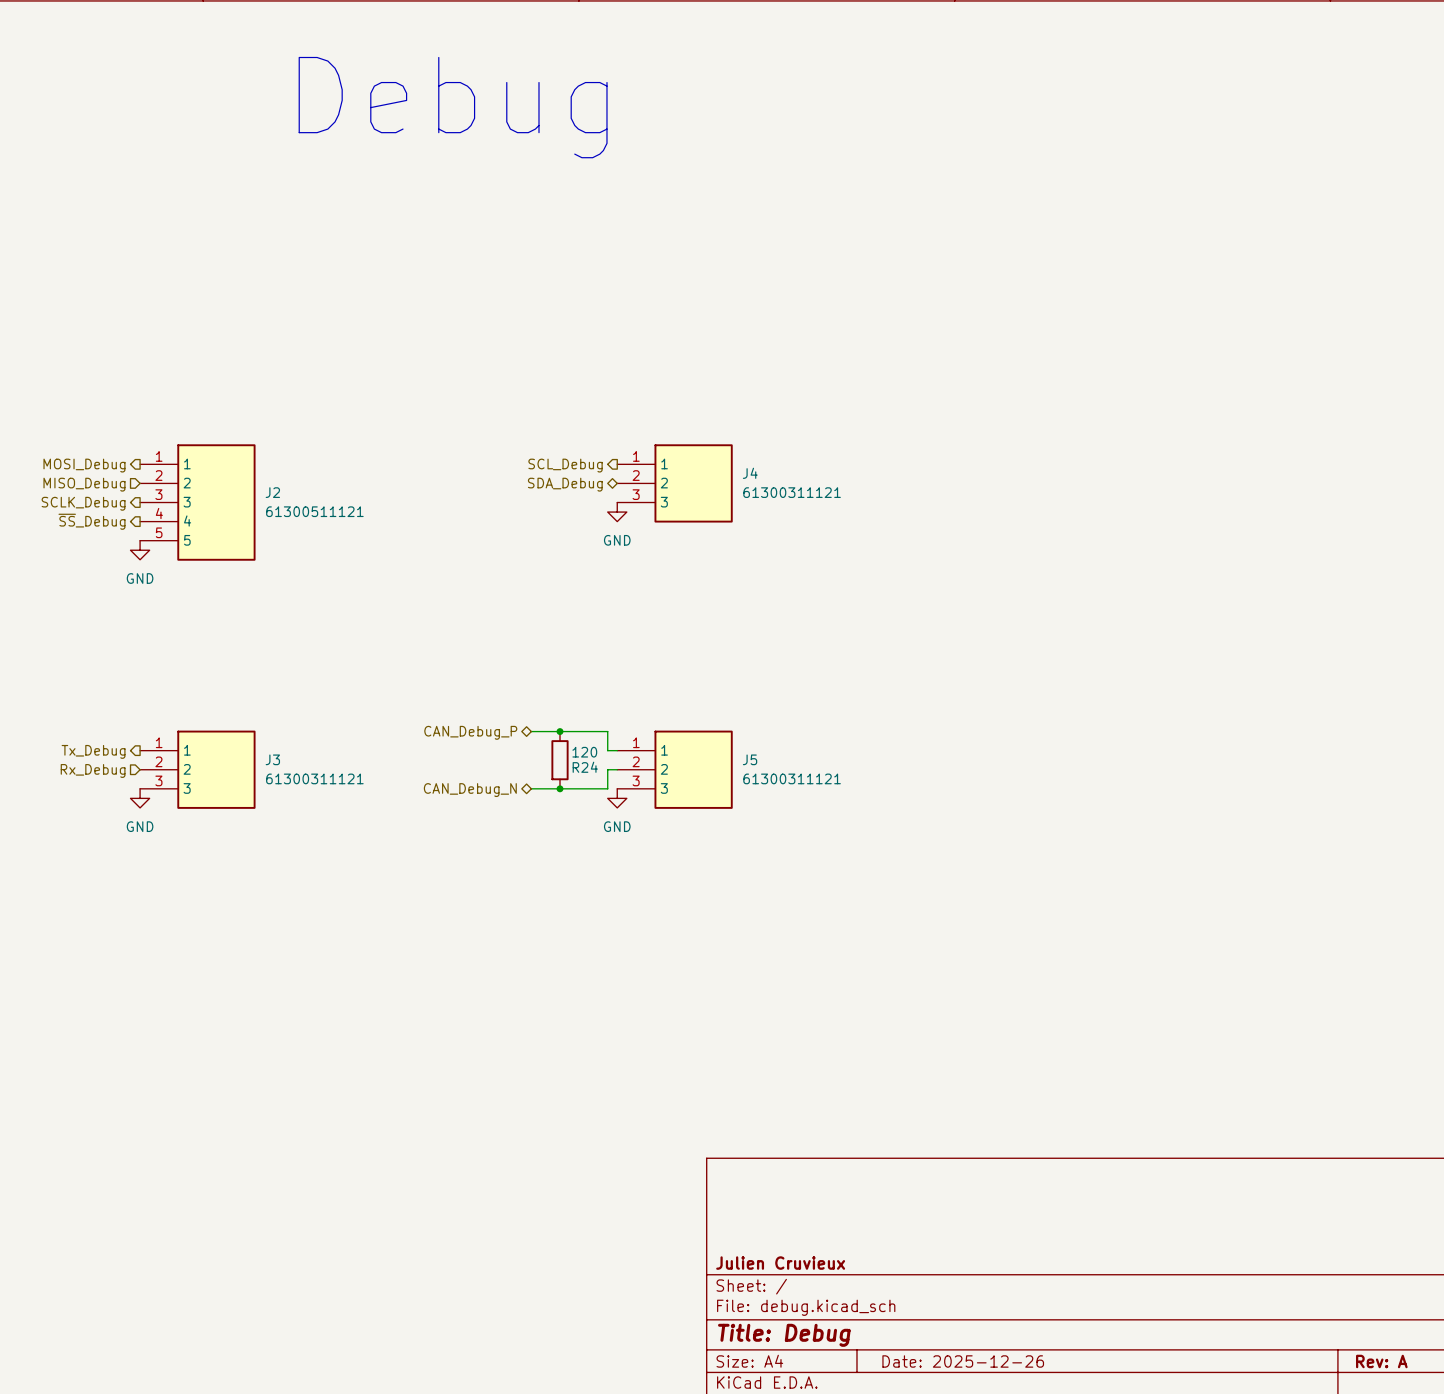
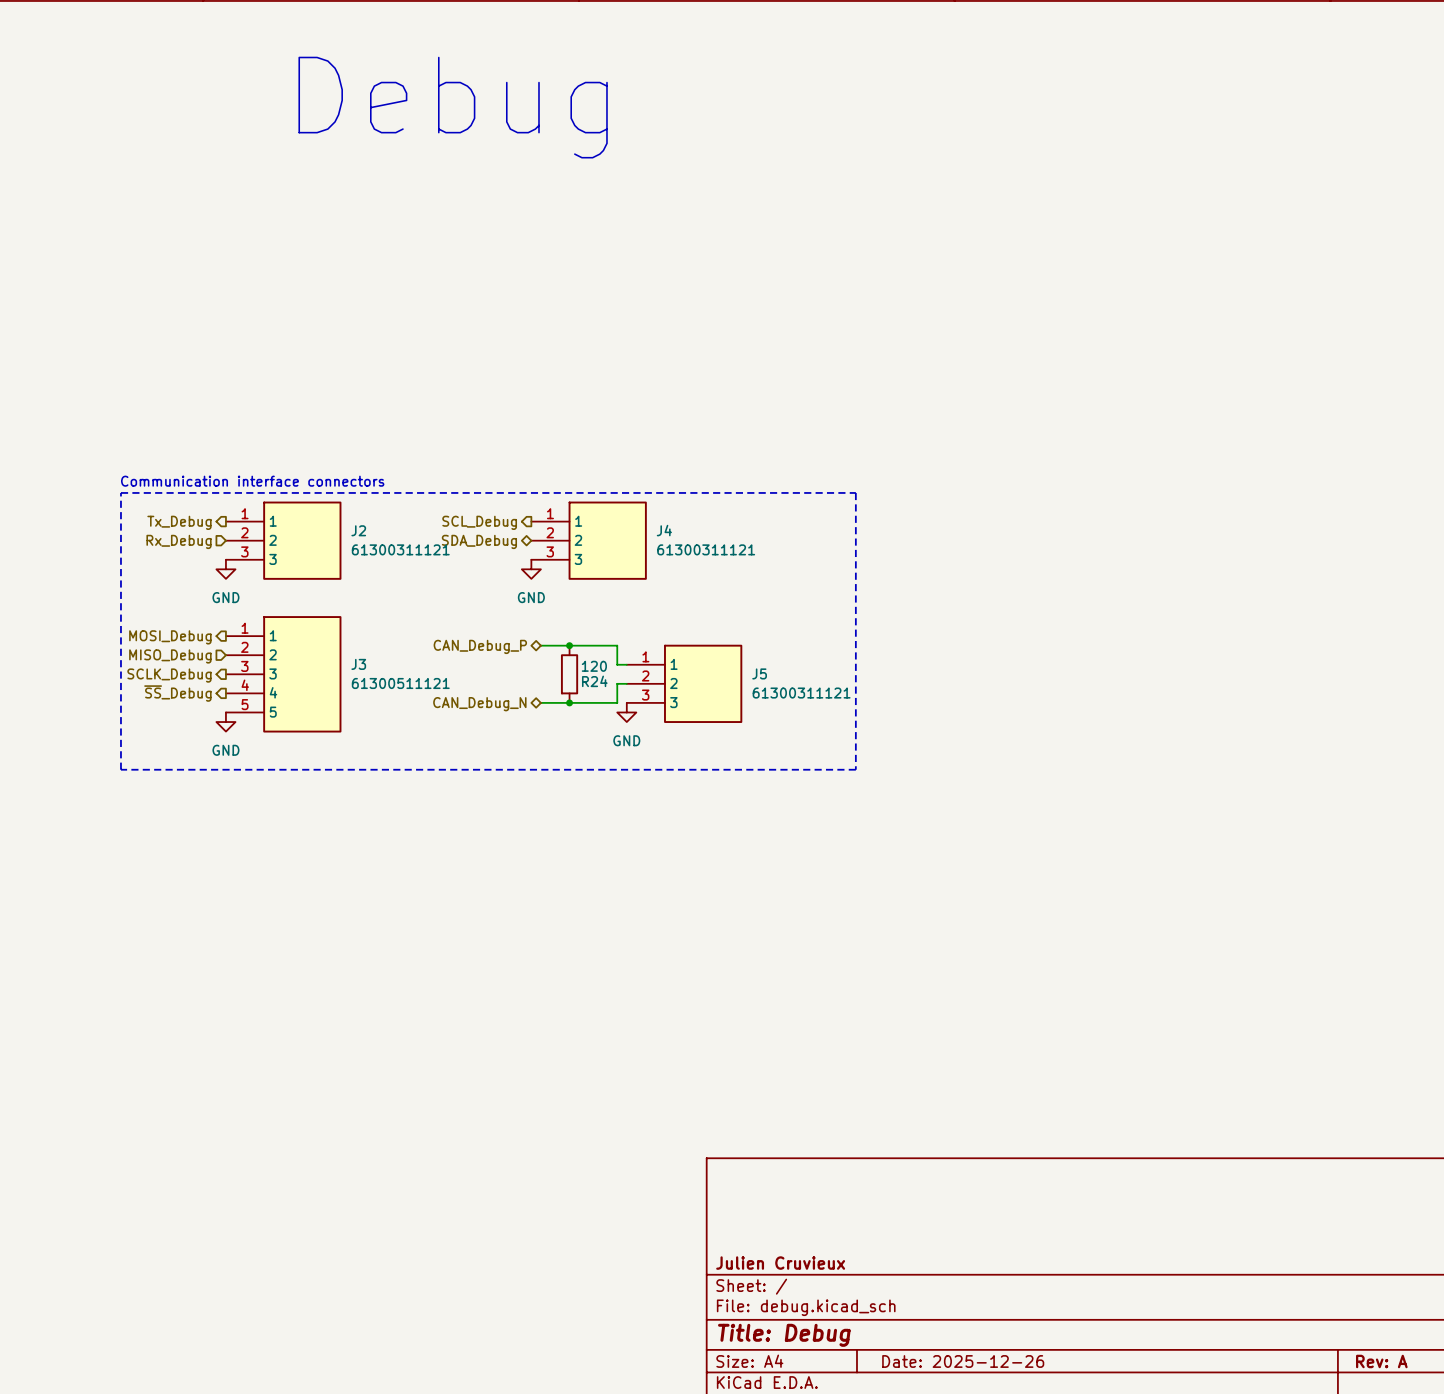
J2 symbol: [140, 444, 256, 561] -> [225, 501, 342, 580]
hierarchical label: MOSI_Debug (84, 465) -> none
hierarchical label position: SCL_Debug (565, 465) -> SCL_Debug (479, 522)
text: none -> Communication interface connectors (252, 481)
J4 position: (675, 483) -> (589, 540)
hierarchical label: MISO_Debug (84, 484) -> none
hierarchical label position: SDA_Debug (565, 484) -> SDA_Debug (479, 541)
line: none -> (120, 492) (855, 492) (855, 769) (120, 769) (120, 492)
hierarchical label: SCLK_Debug (83, 503) -> none
J2 value: 61300511121 (314, 511) -> 61300311121 (400, 549)
power symbol: GND (617, 512) -> none
hierarchical label: ~{SS}_Debug (91, 521) -> none
hierarchical label: none -> Tx_Debug (179, 522)
hierarchical label: none -> Rx_Debug (179, 541)
power symbol position: GND (140, 550) -> GND (225, 569)
power symbol: none -> GND (531, 569)
hierarchical label: none -> MOSI_Debug (170, 637)
junction: none -> (569, 645)
hierarchical label: none -> MISO_Debug (170, 656)
hierarchical label: none -> SCLK_Debug (169, 675)
hierarchical label: none -> ~{SS}_Debug (177, 693)
power symbol: none -> GND (225, 722)
J3 symbol: [140, 730, 256, 809] -> [225, 616, 342, 733]
wire: (531, 731) (607, 731) (607, 750) (617, 750) -> (540, 645) (617, 645) (617, 664) (626, 664)
junction position: (560, 731) -> (569, 702)
hierarchical label position: CAN_Debug_P (470, 732) -> CAN_Debug_P (480, 646)
hierarchical label: Tx_Debug (93, 751) -> none
R24 position: (560, 760) -> (569, 674)
wire: (617, 769) (607, 769) (607, 788) (531, 788) -> (626, 683) (617, 683) (617, 702) (540, 702)
J5 position: (675, 769) -> (684, 683)
hierarchical label: Rx_Debug (93, 770) -> none
J3 value: 61300311121 (314, 778) -> 61300511121 (400, 683)
junction: (560, 788) -> none
hierarchical label position: CAN_Debug_N (470, 790) -> CAN_Debug_N (479, 704)
power symbol: GND (140, 798) -> none
power symbol position: GND (617, 798) -> GND (626, 712)

